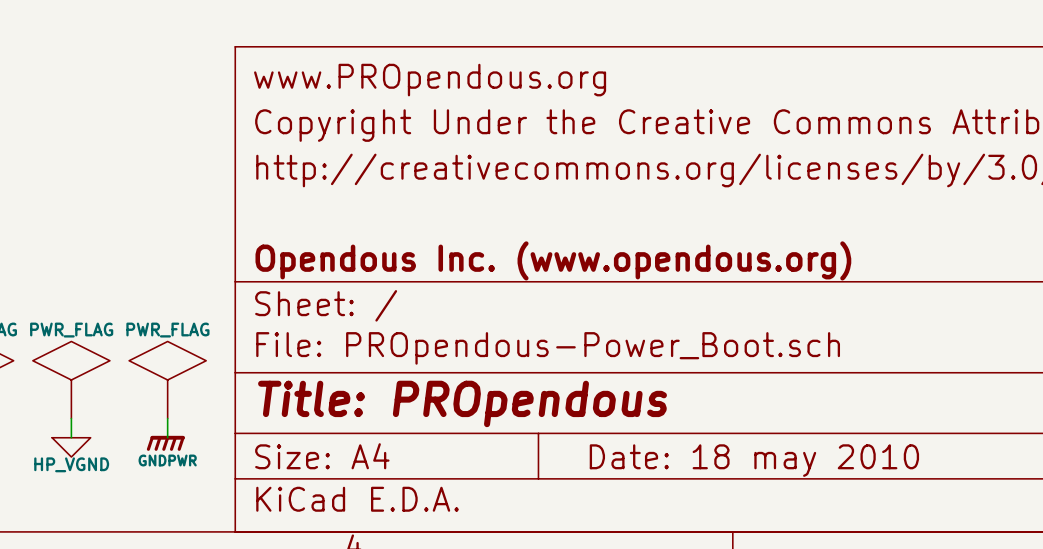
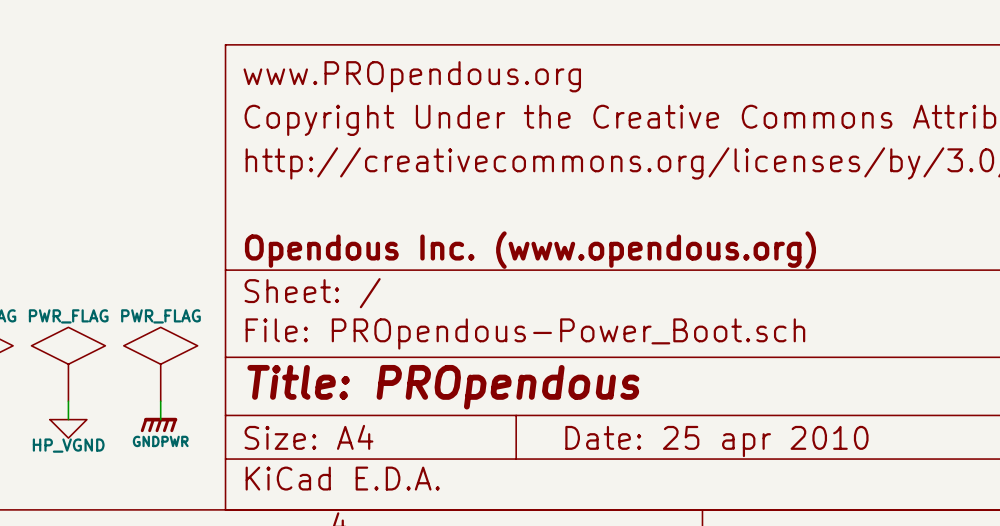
title block: Date: 18 may 2010 (754, 460) -> Date: 25 apr 2010 (716, 441)

